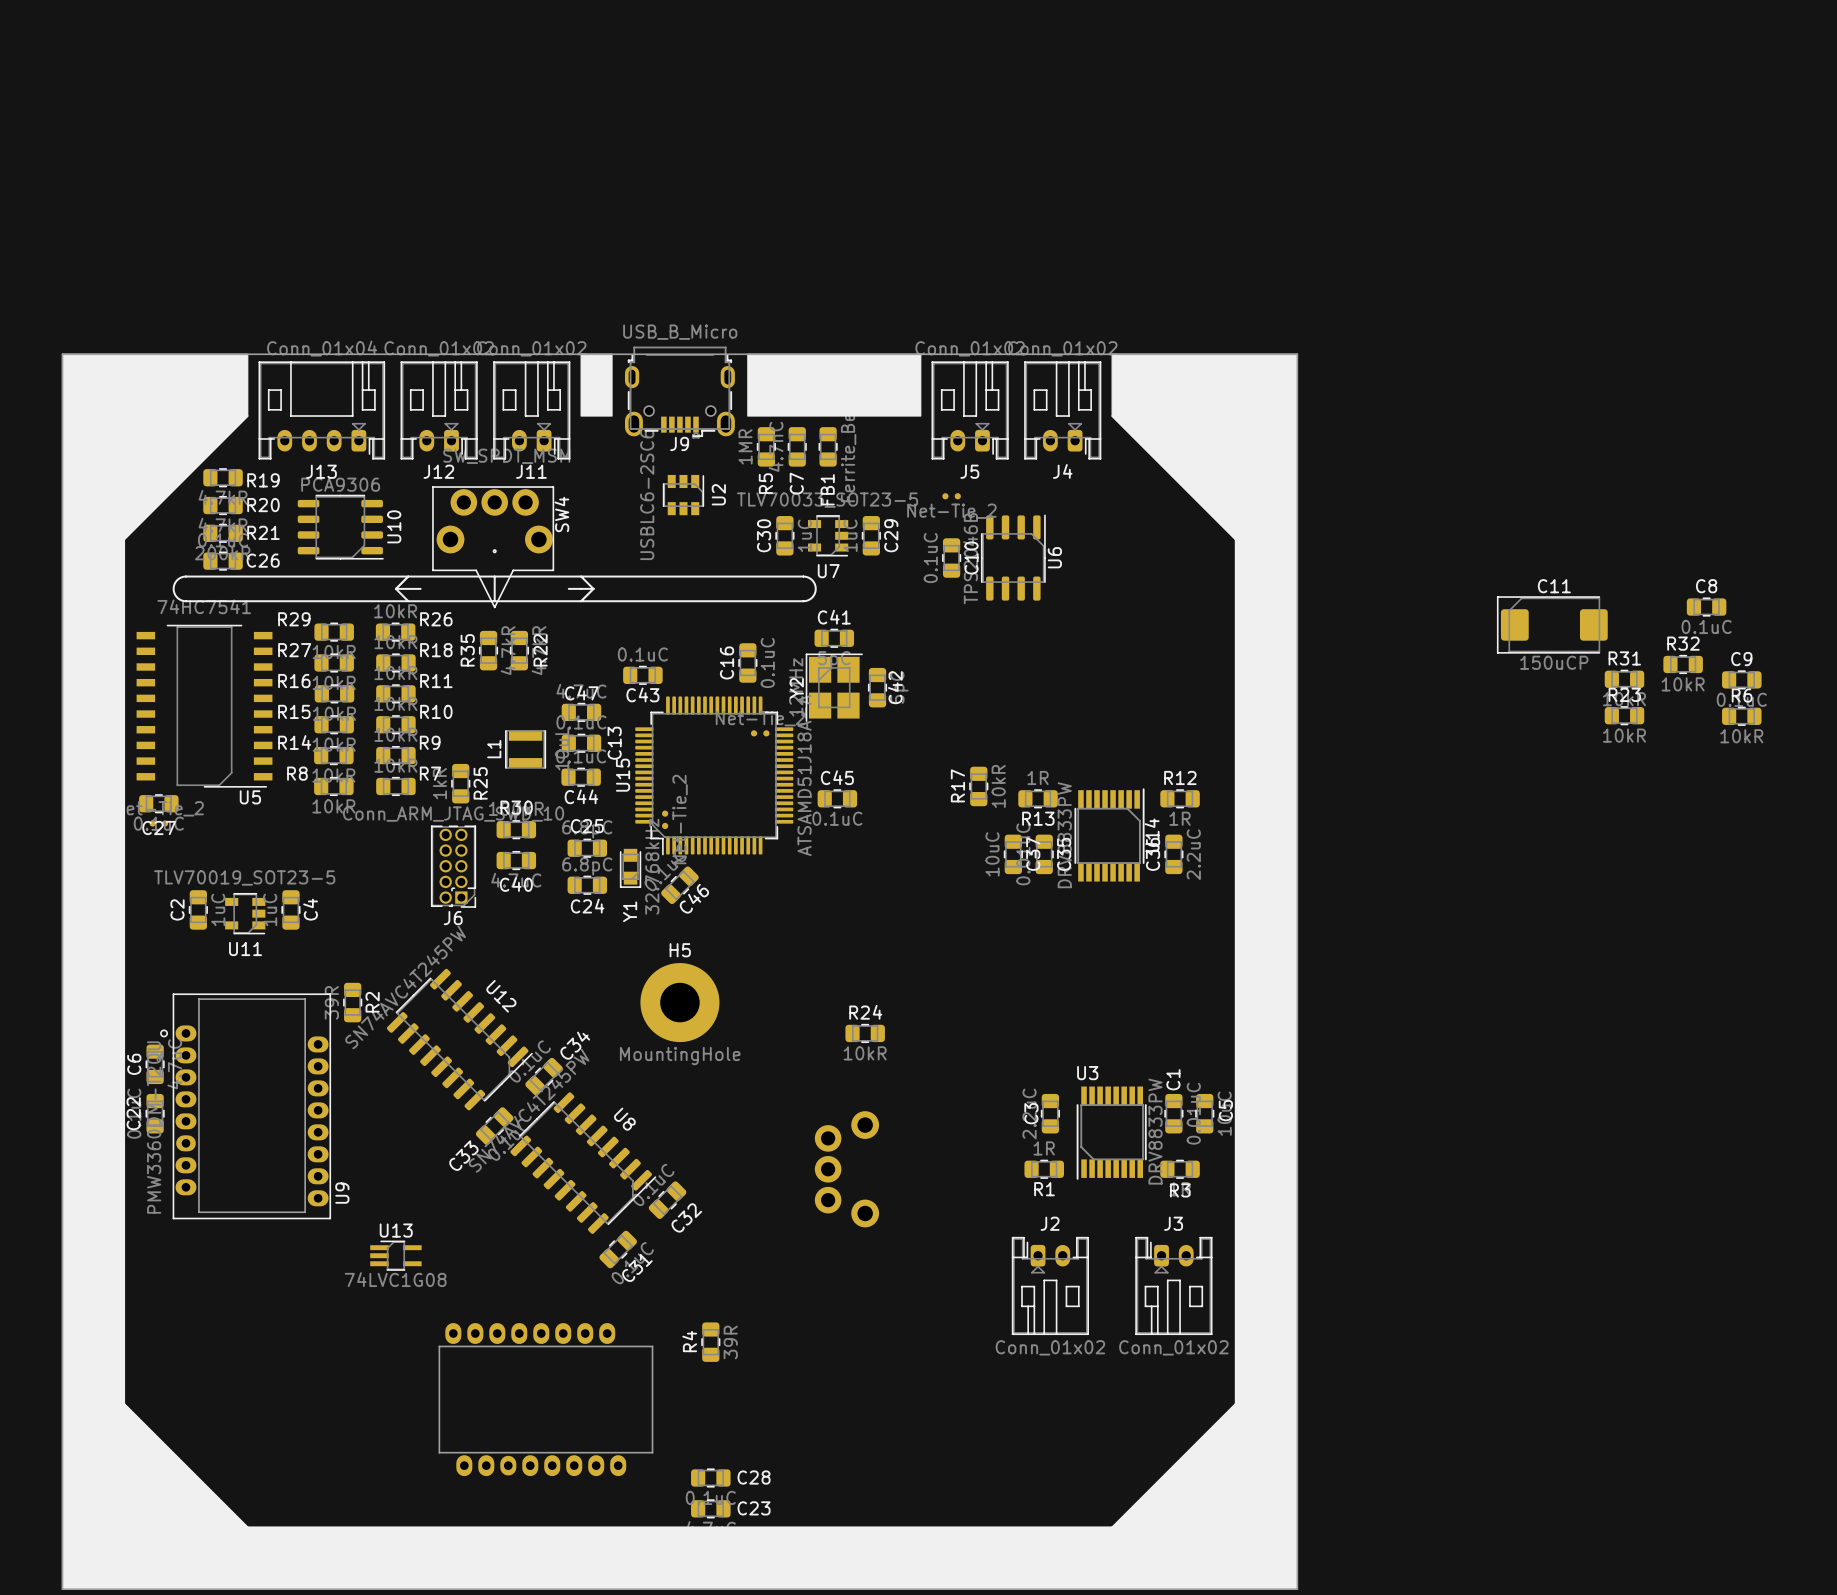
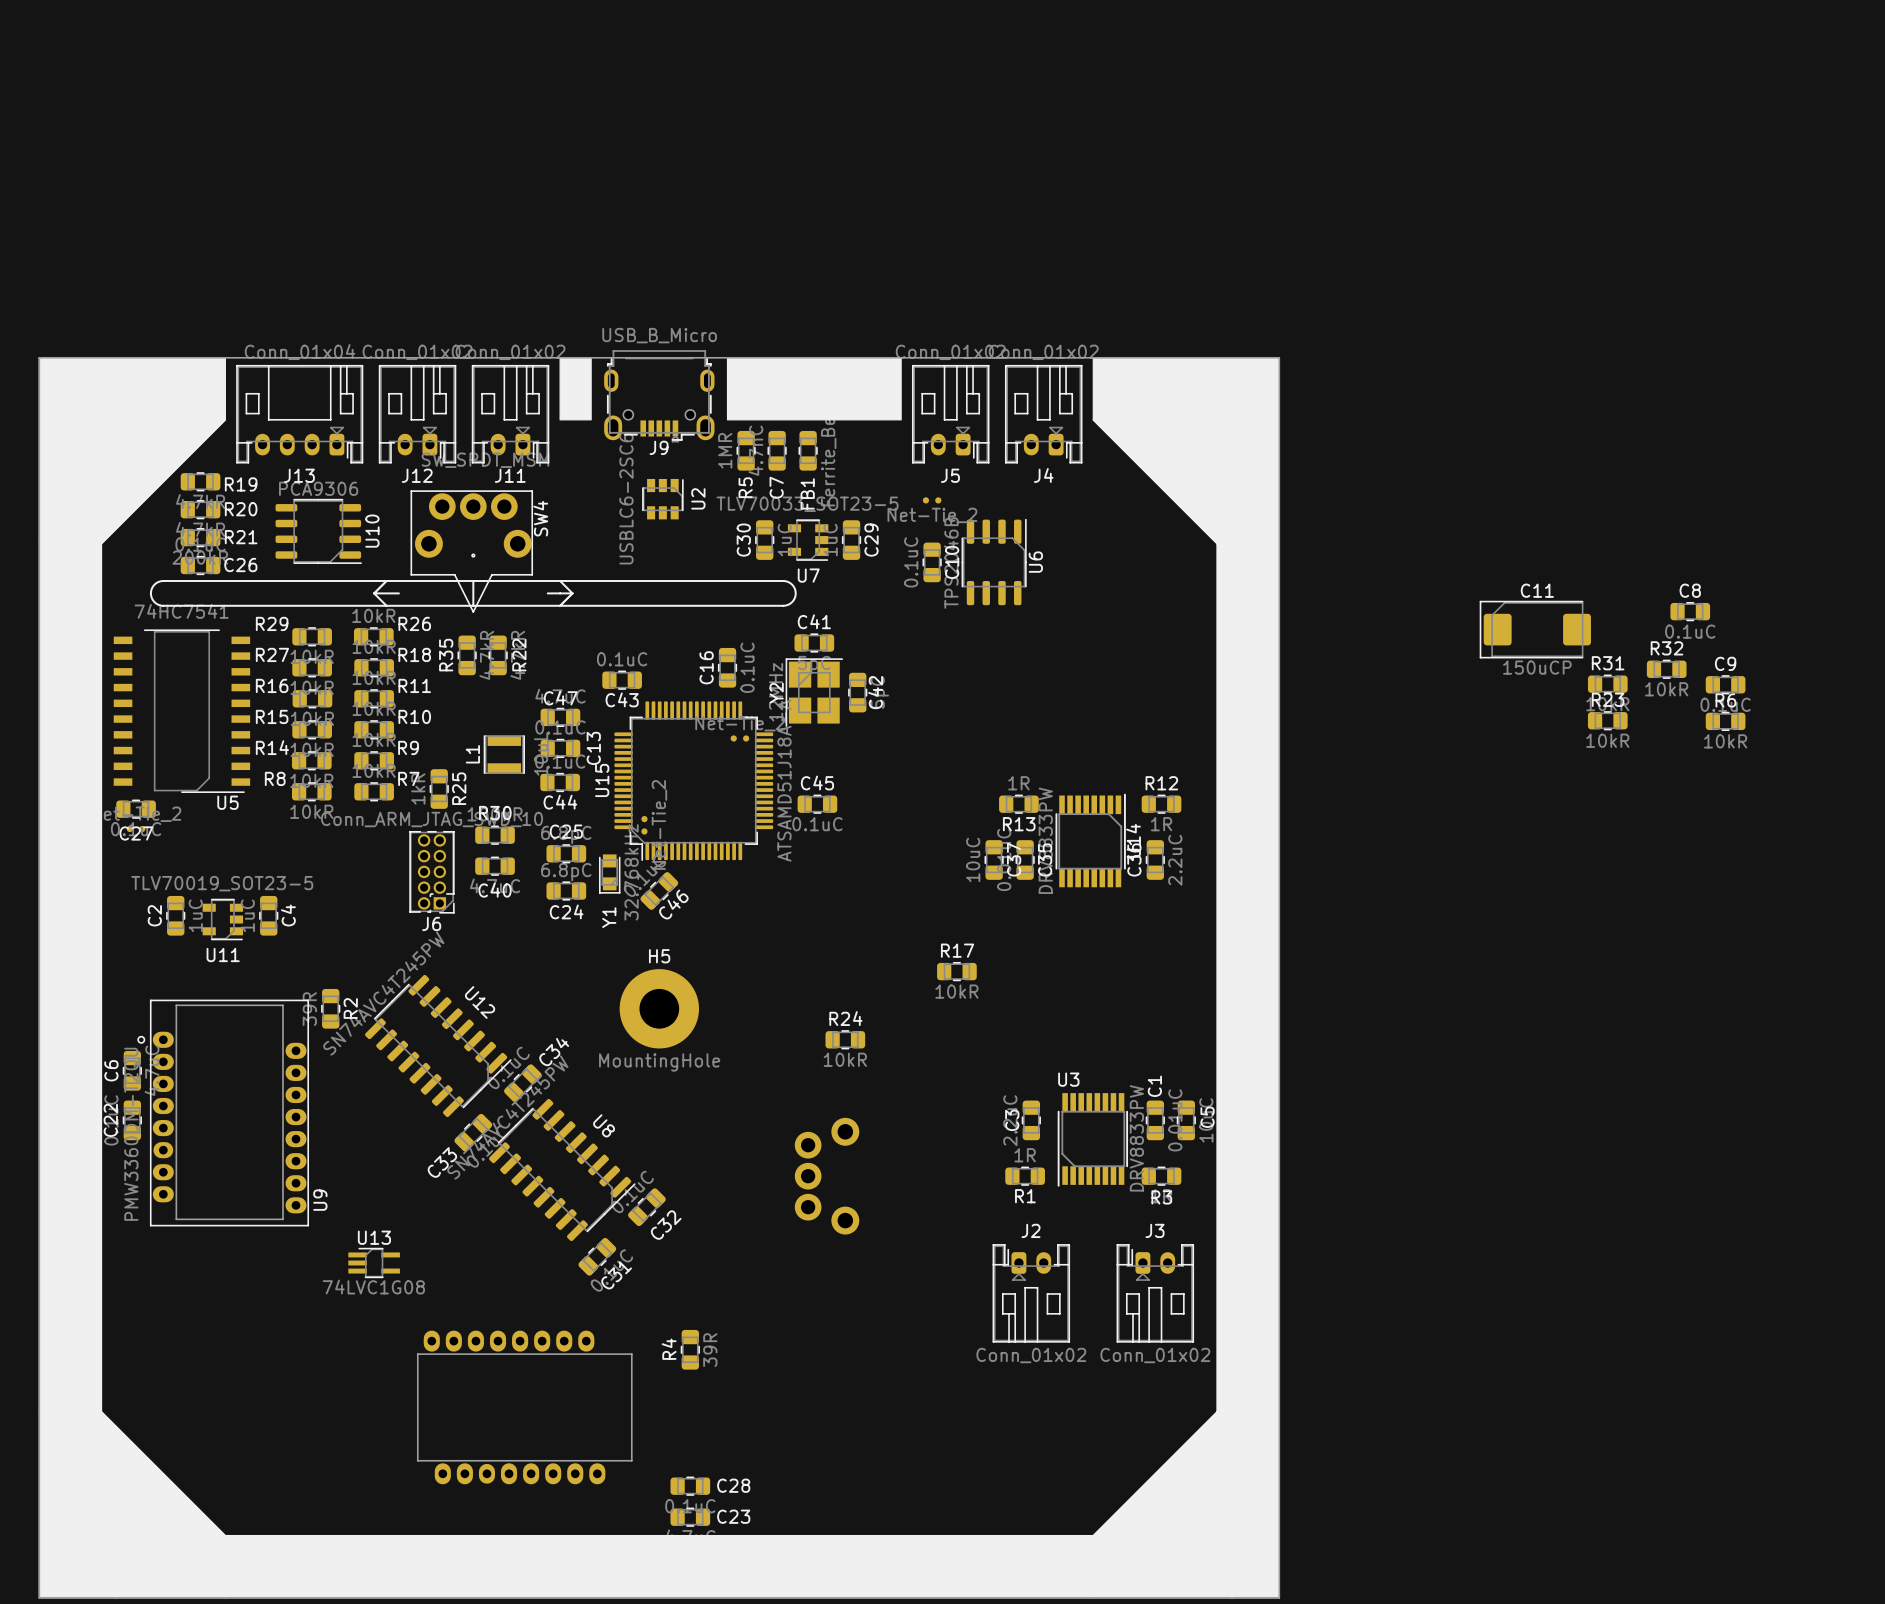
R17 rotation: 0° (978, 786) -> 90° clockwise (956, 971)
R17 position: (978, 786) -> (956, 971)

